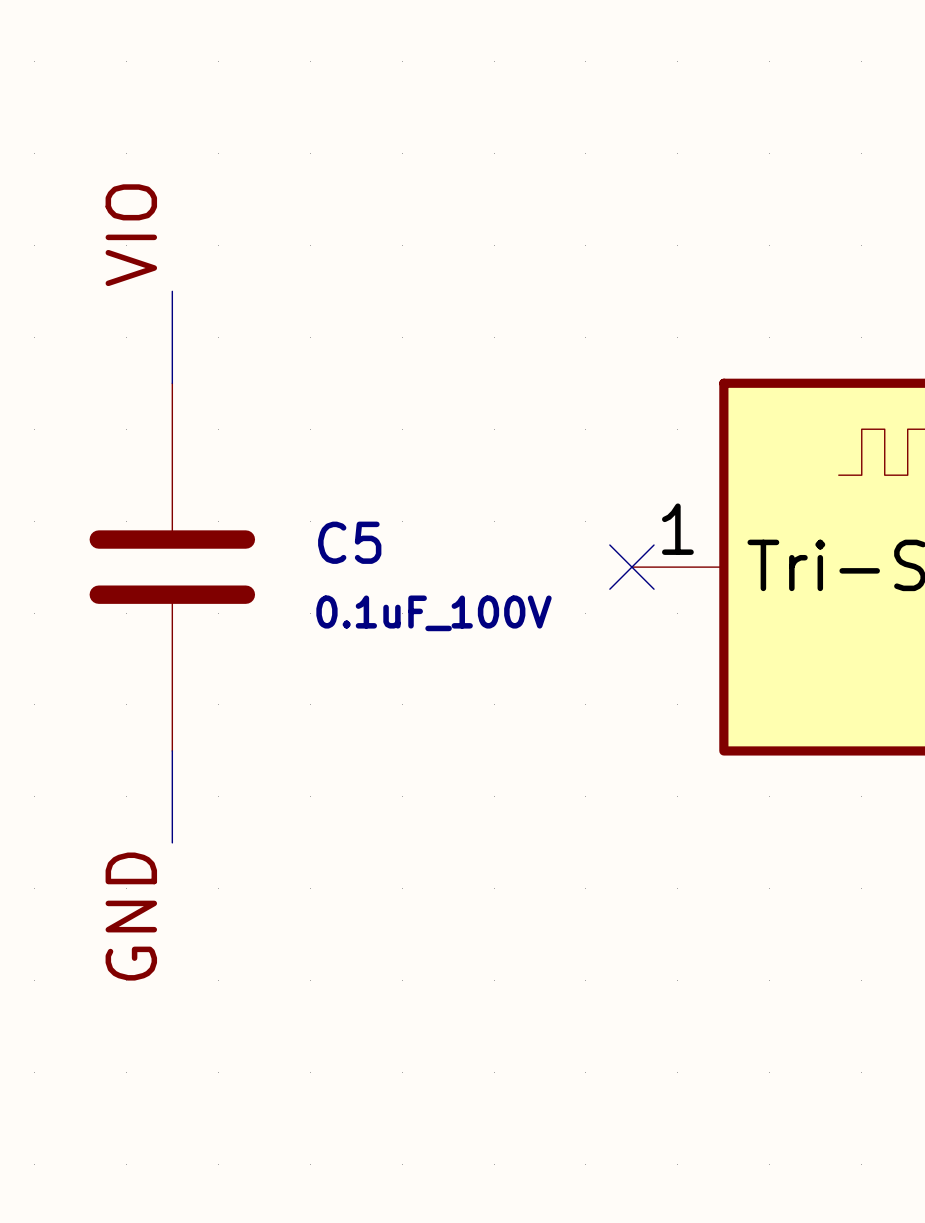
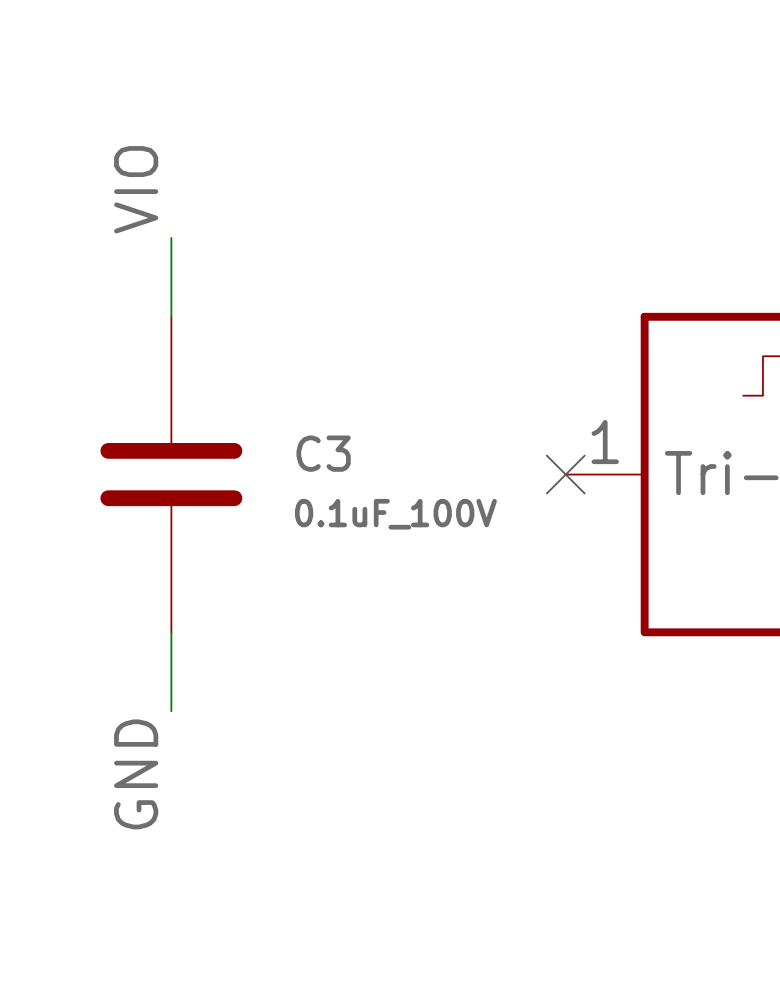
C5 name: C5 (349, 542) -> C3 (323, 453)

